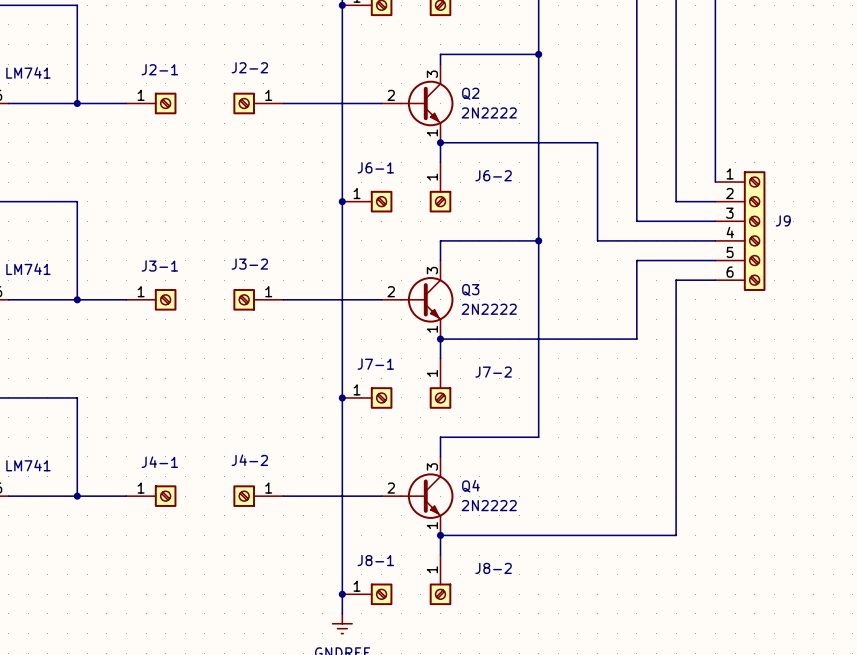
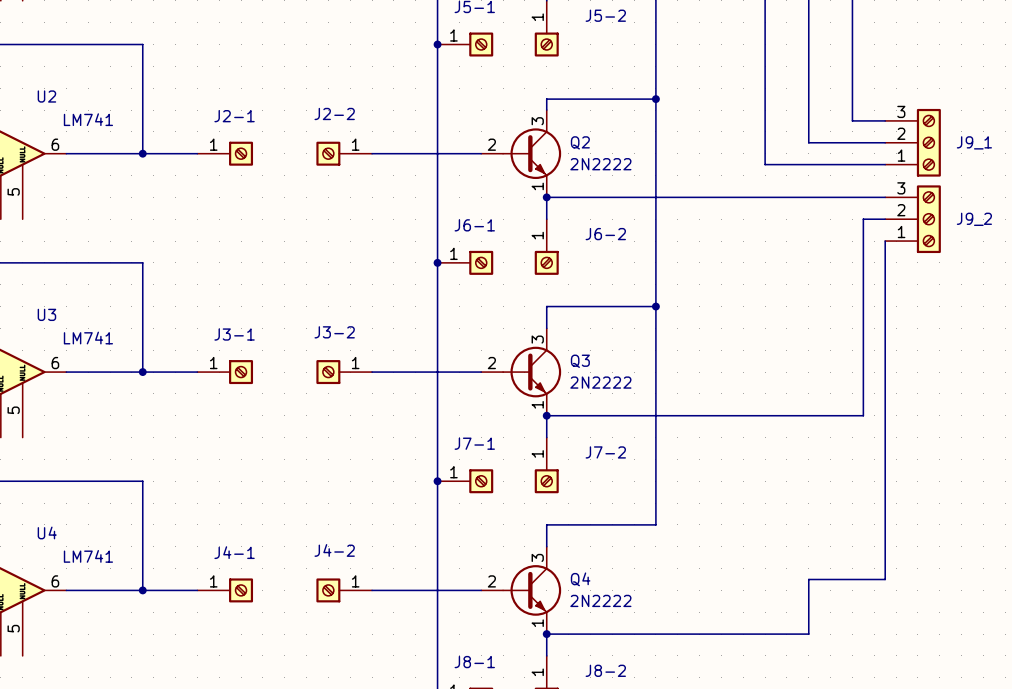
wire: (715, 74) (715, 182) -> (852, 120) (885, 120)
wire: (676, 93) (676, 201) (715, 201) -> (808, 142) (885, 142)
J9_1: none -> (913, 142)
wire: (636, 113) (636, 221) (715, 221) -> (765, 164) (885, 164)
wire: (597, 142) (597, 240) (715, 240) -> (721, 197) (885, 197)
J9_2: none -> (913, 219)
J9: (740, 231) -> none
wire: (715, 260) (636, 260) (636, 339) -> (885, 219) (863, 219) (863, 415) (765, 415)
wire: (715, 280) (676, 280) (676, 486) -> (885, 241) (885, 579) (808, 579)

